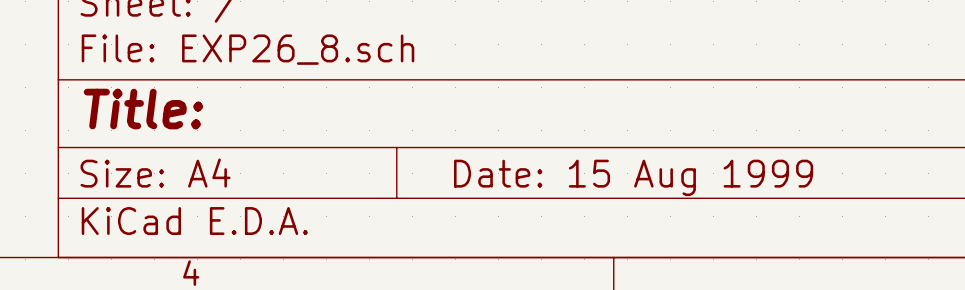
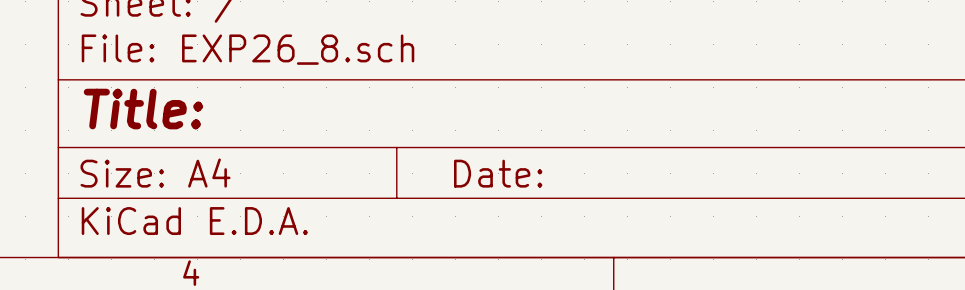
title block: Date: 15 Aug 1999 (633, 177) -> Date: (498, 173)

